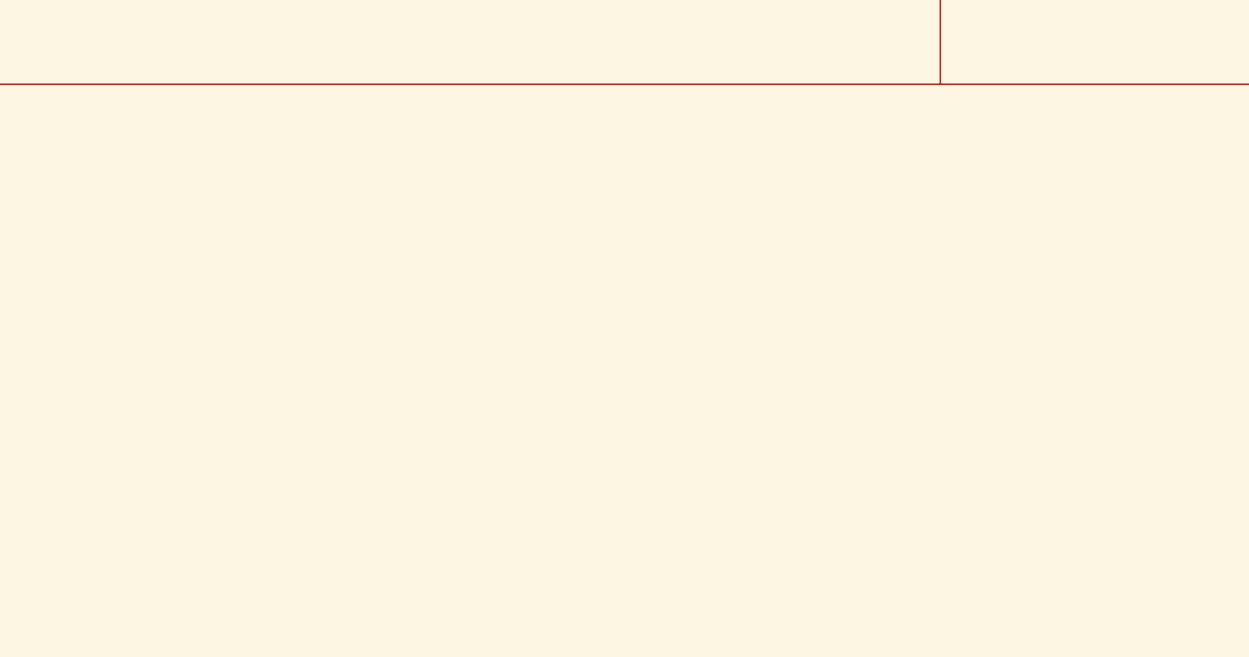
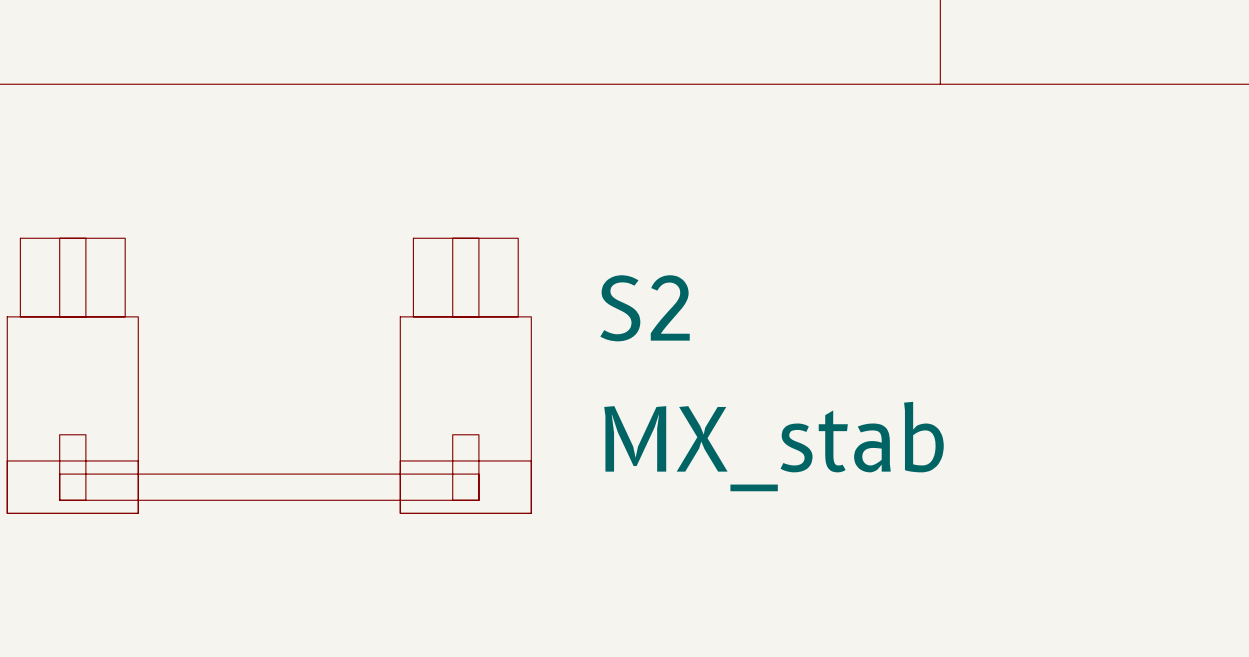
S2: none -> MX_stab (269, 375)

